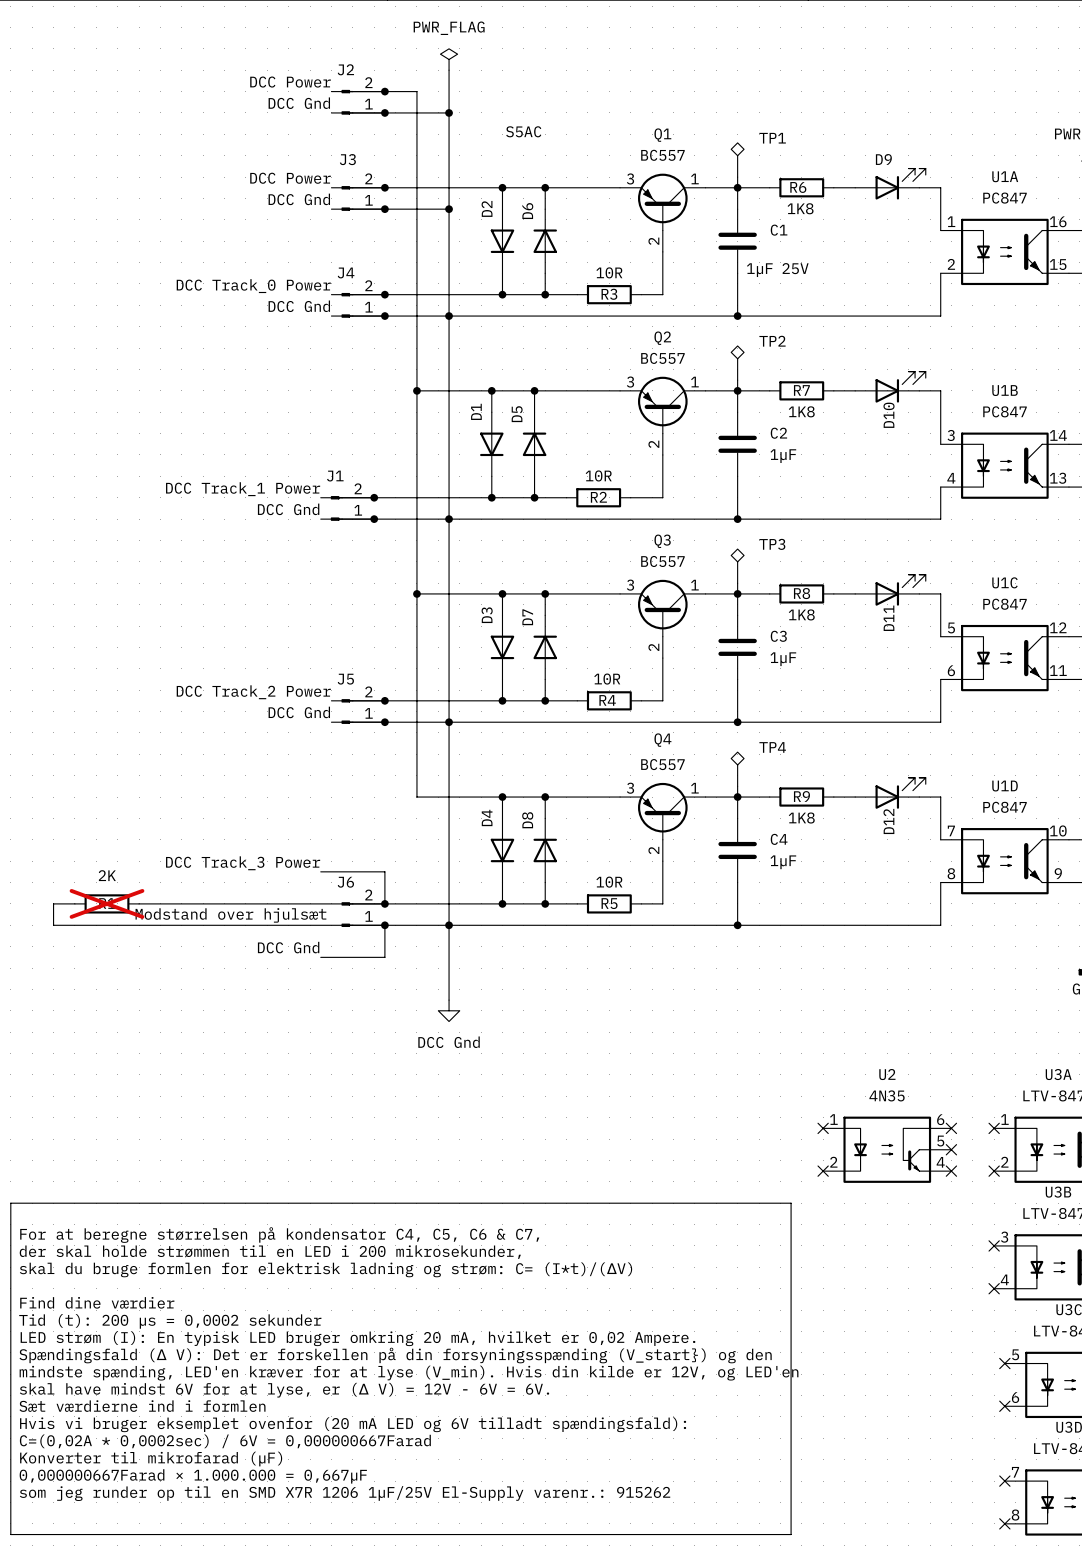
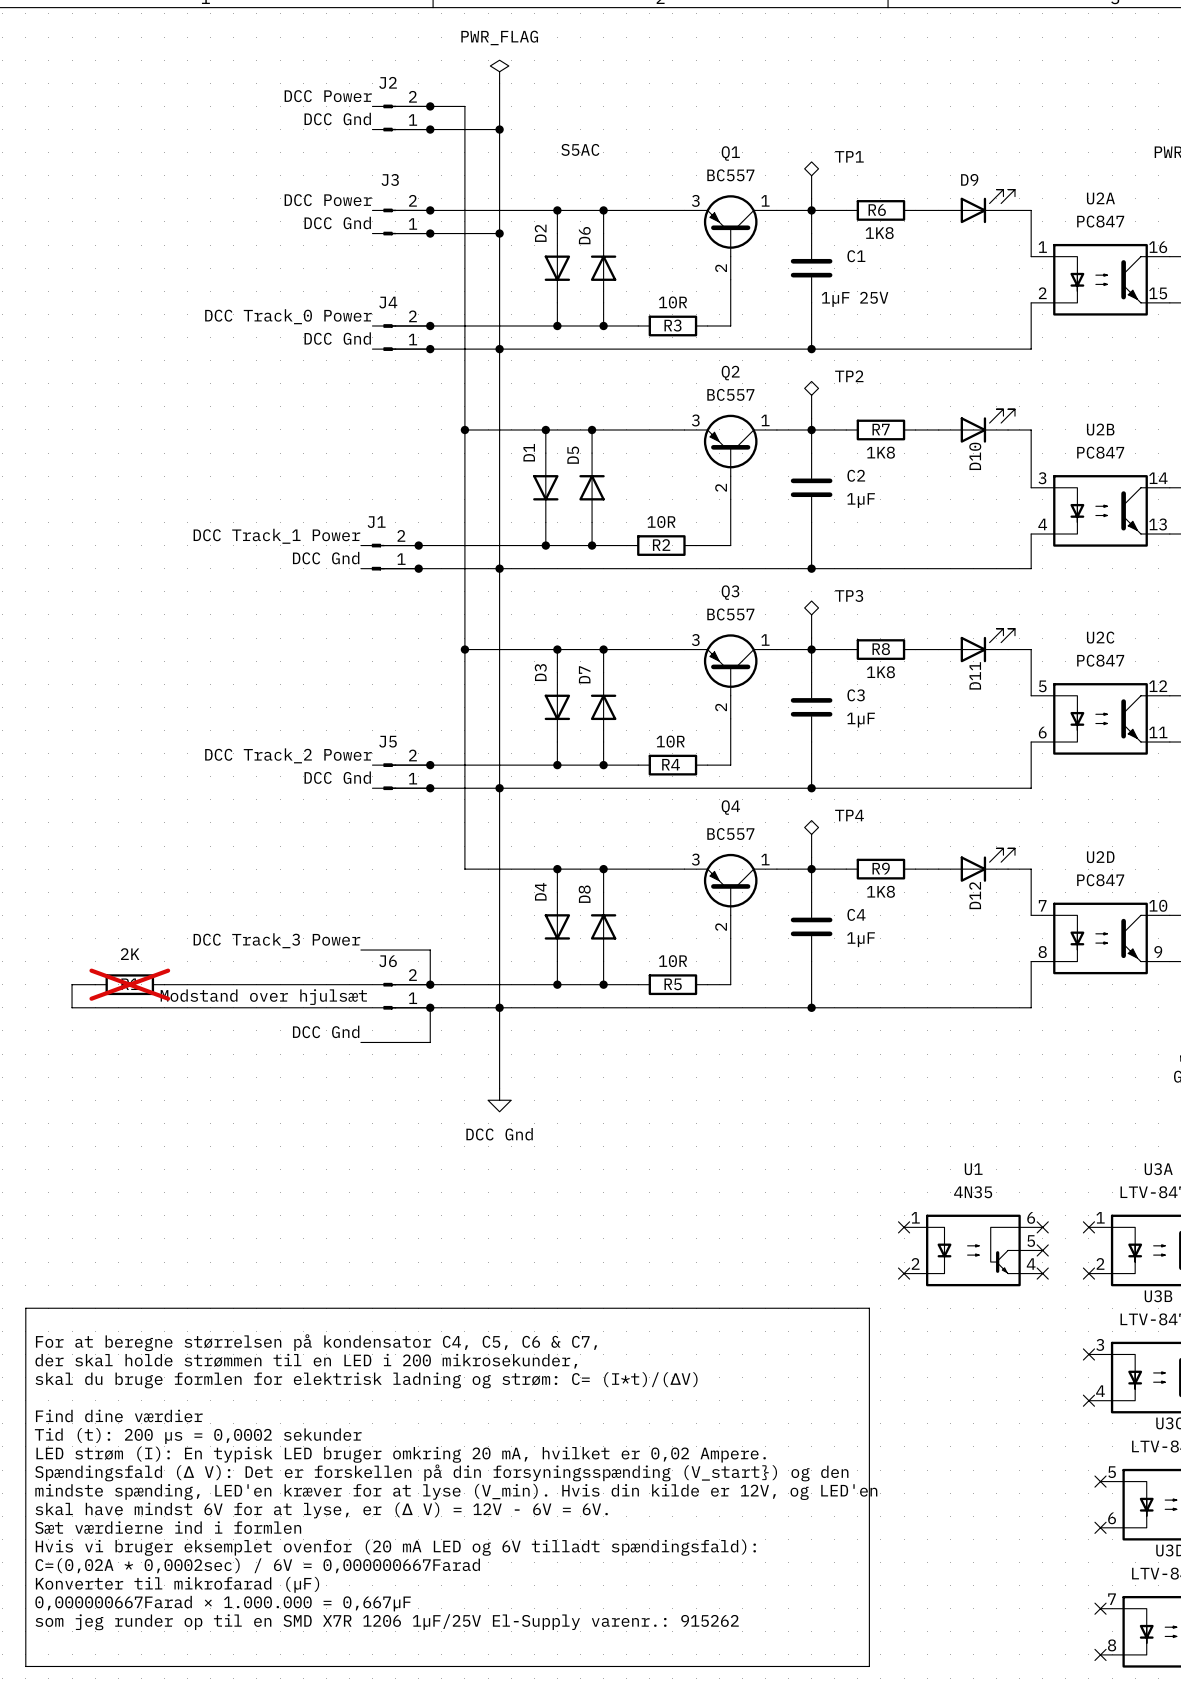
U1A name: U1A (1005, 176) -> U2A (1100, 198)
U1B name: U1B (1005, 390) -> U2B (1100, 429)
U1C name: U1C (1004, 582) -> U2C (1100, 637)
U1D name: U1D (1005, 786) -> U2D (1100, 857)
U2 name: U2 (887, 1074) -> U1 (973, 1169)

